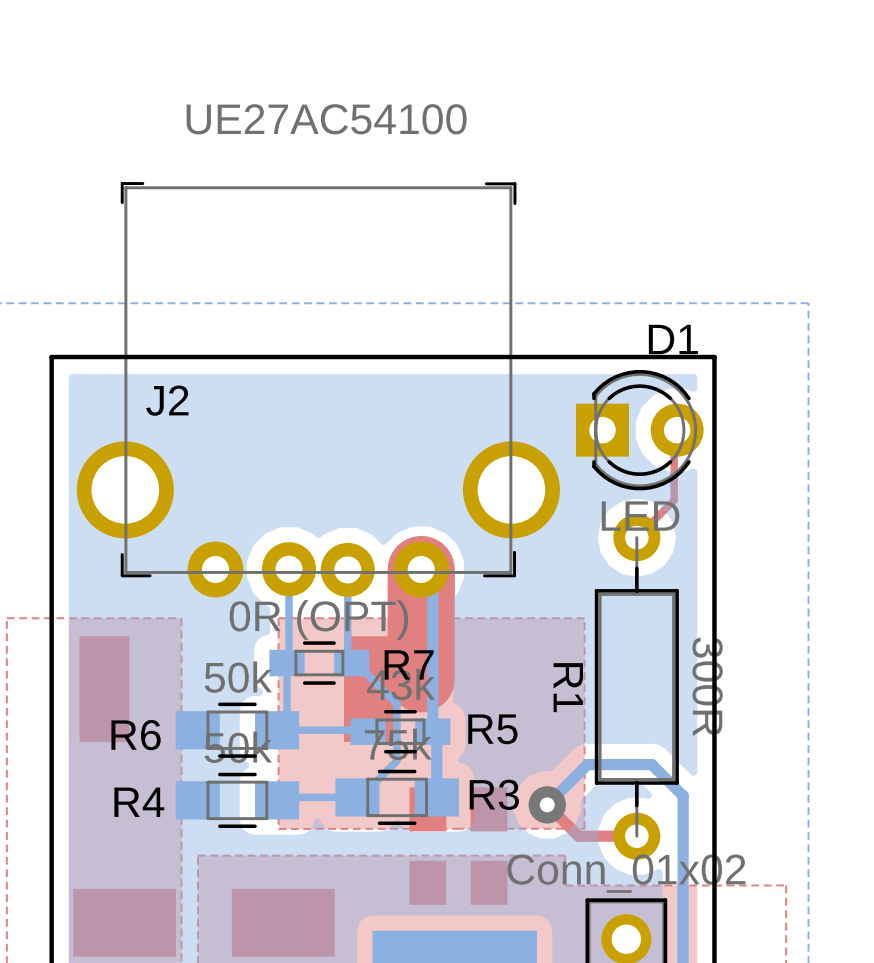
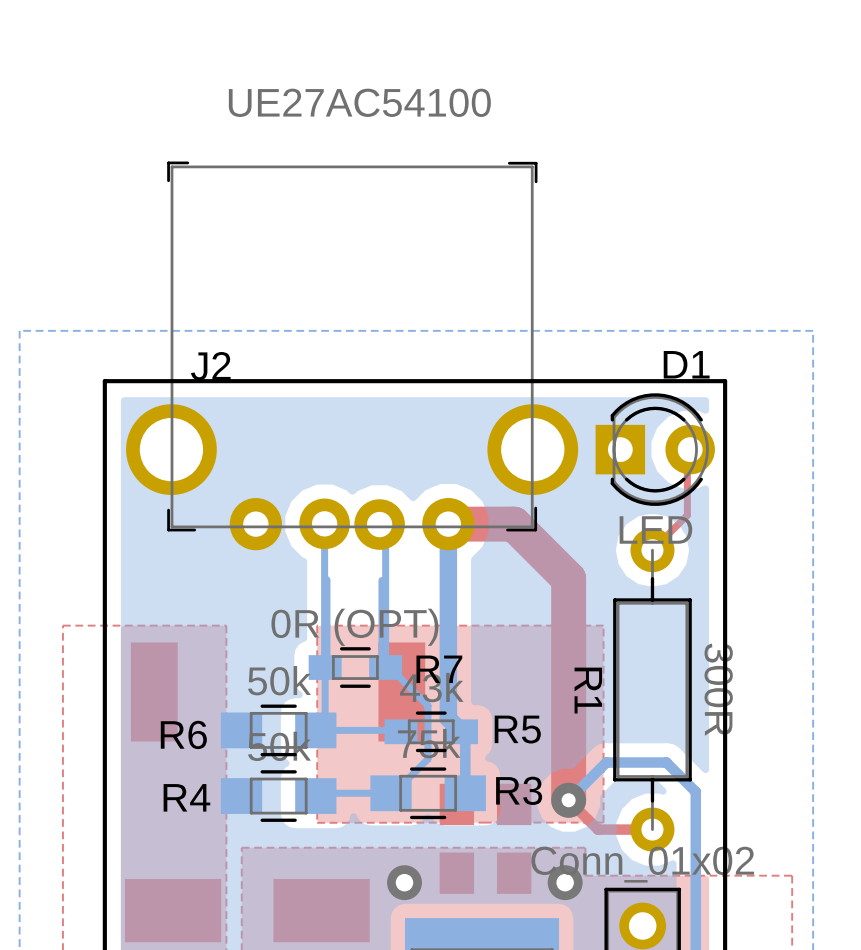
J2 position: (318, 389) -> (352, 355)
bottom track: none -> (324, 523) (325, 667)
top track: none -> (448, 524) (513, 524) (568, 578) (568, 800)
bottom track: none -> (379, 524) (385, 530) (385, 667)
bottom track: (421, 569) (432, 581) (432, 731) -> (448, 524) (448, 718) (461, 731)
top track: (421, 569) (421, 678) -> none
via: none -> (404, 882)
via: none -> (565, 882)

